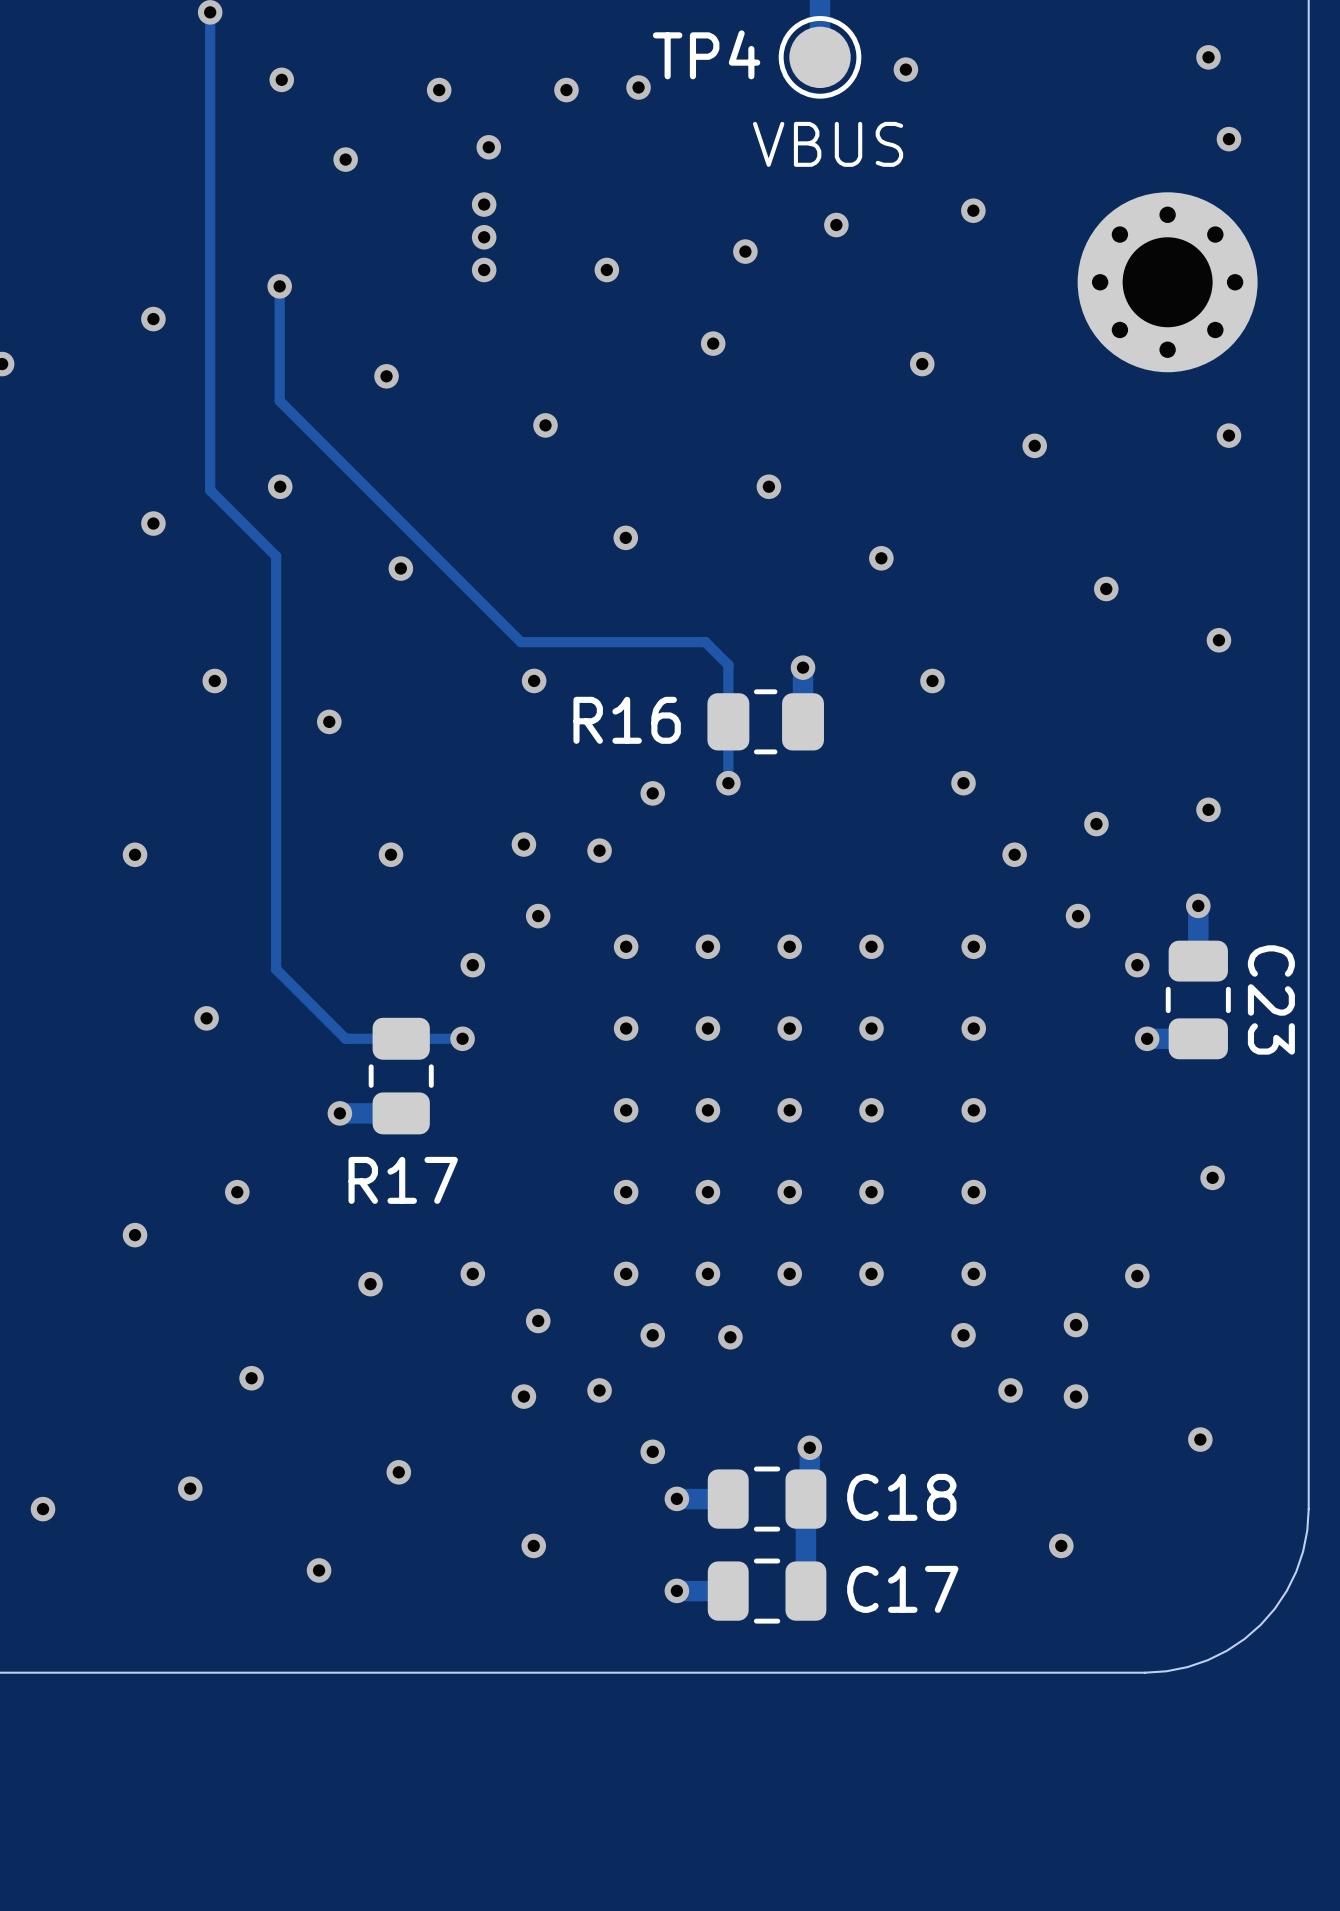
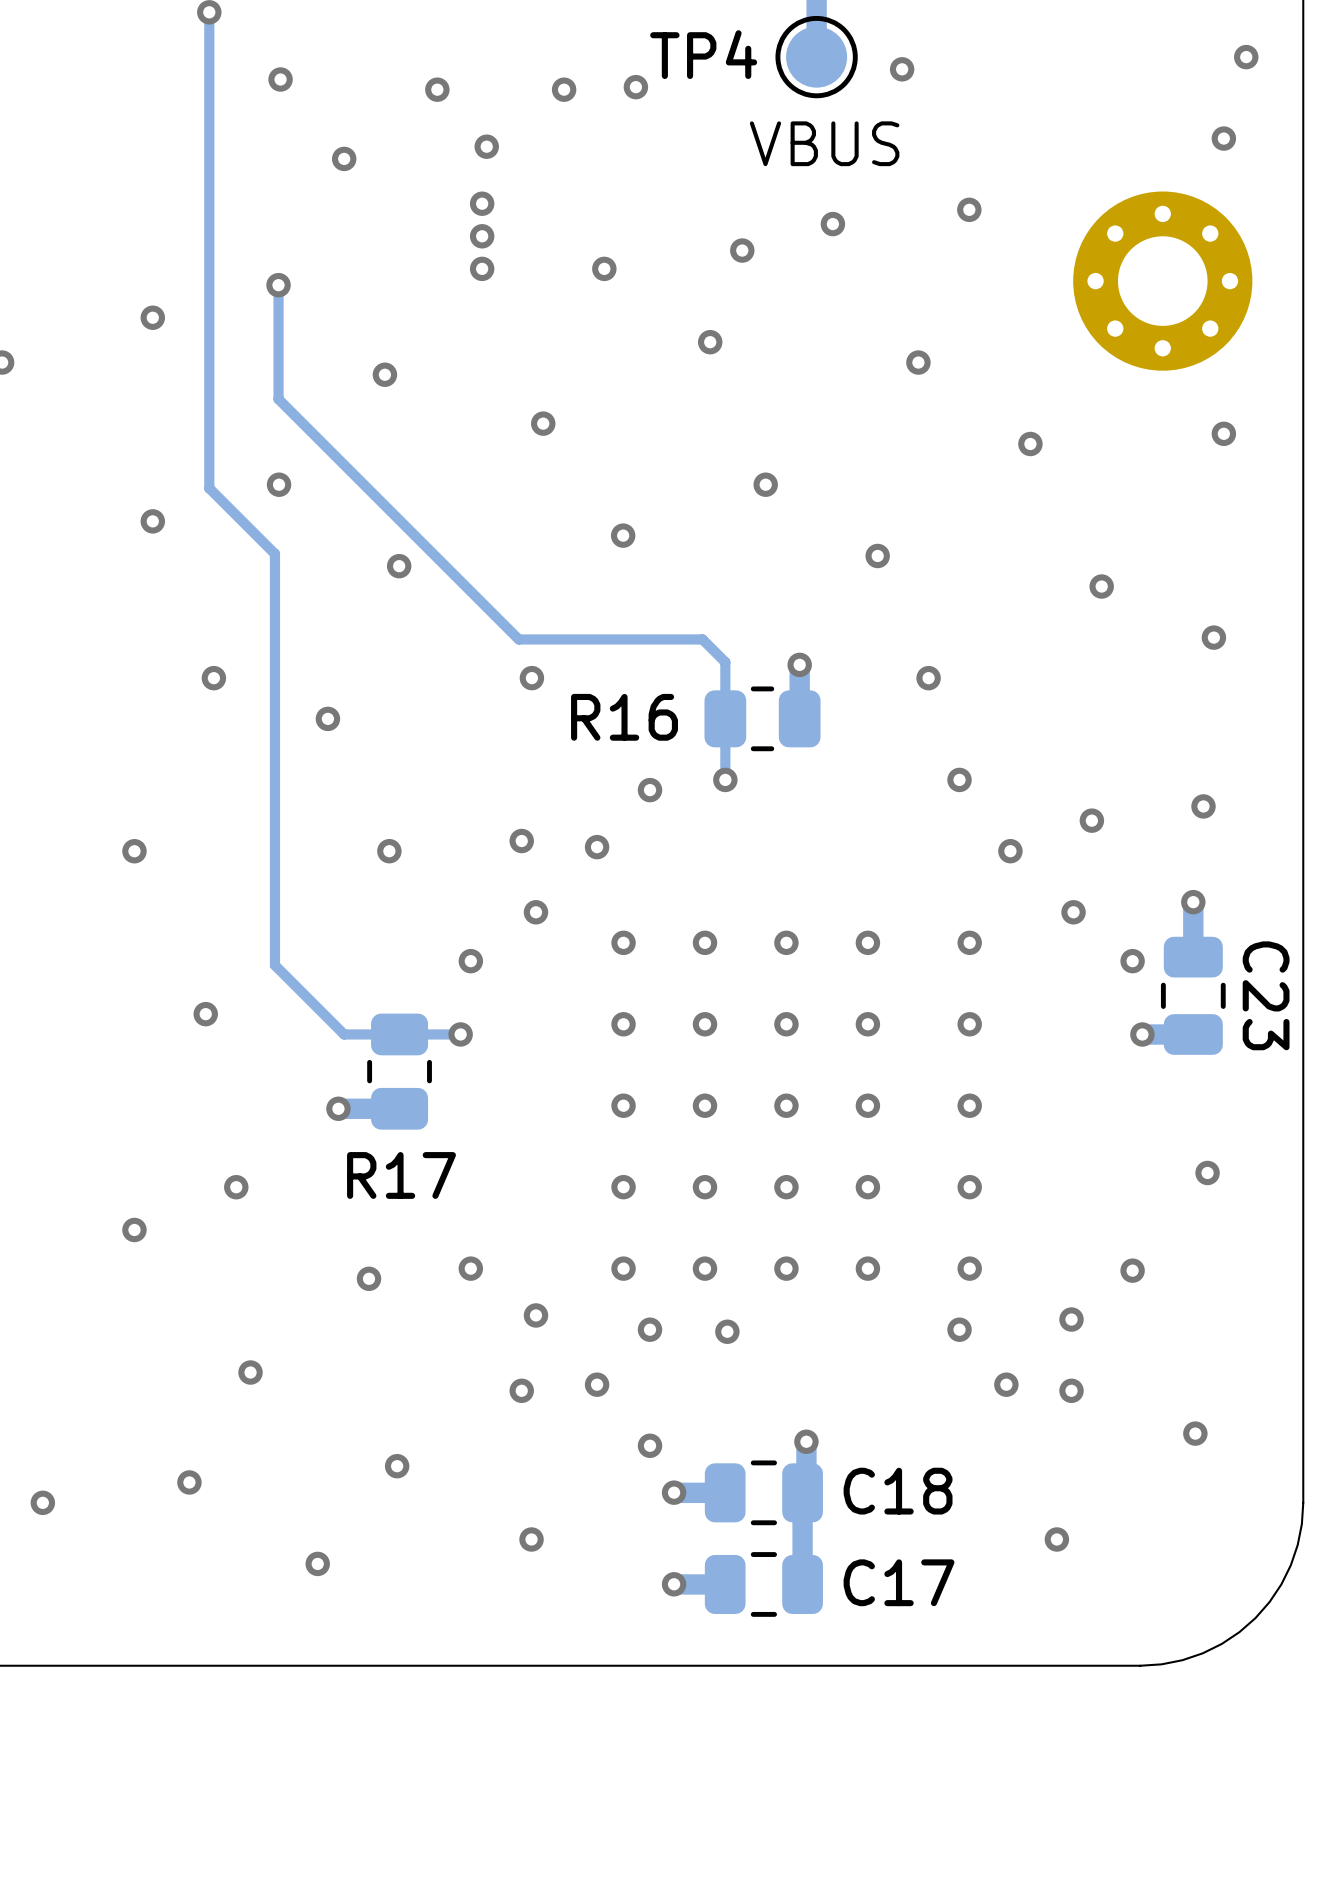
via position: (1208, 57) -> (1246, 57)

